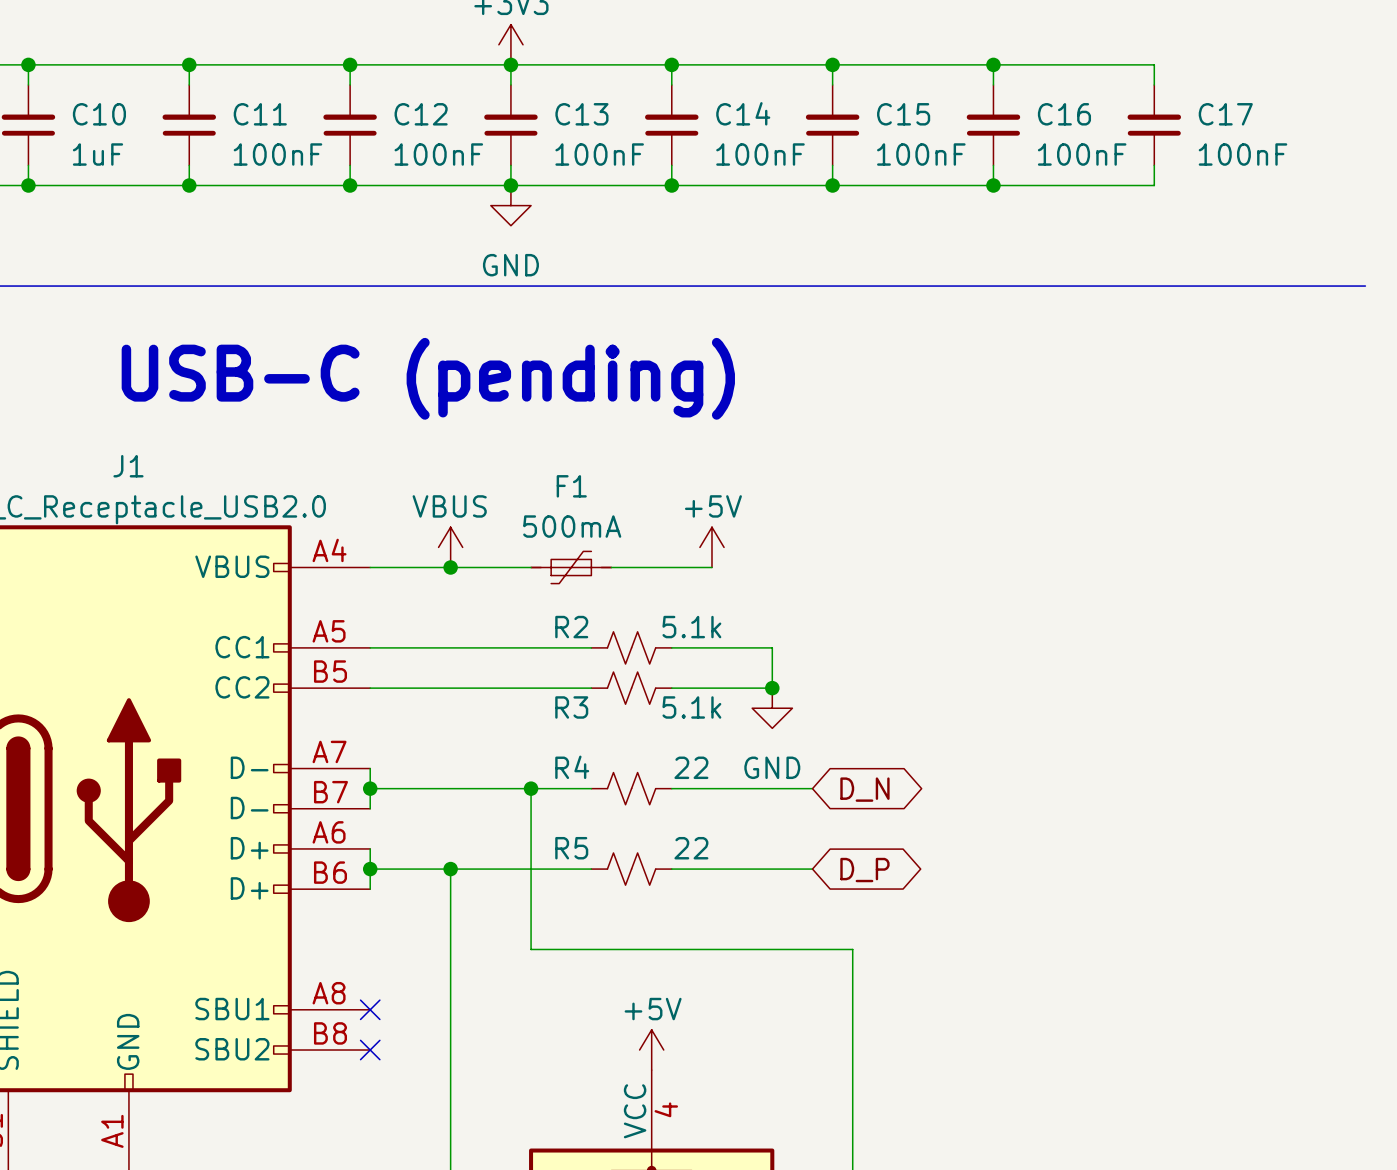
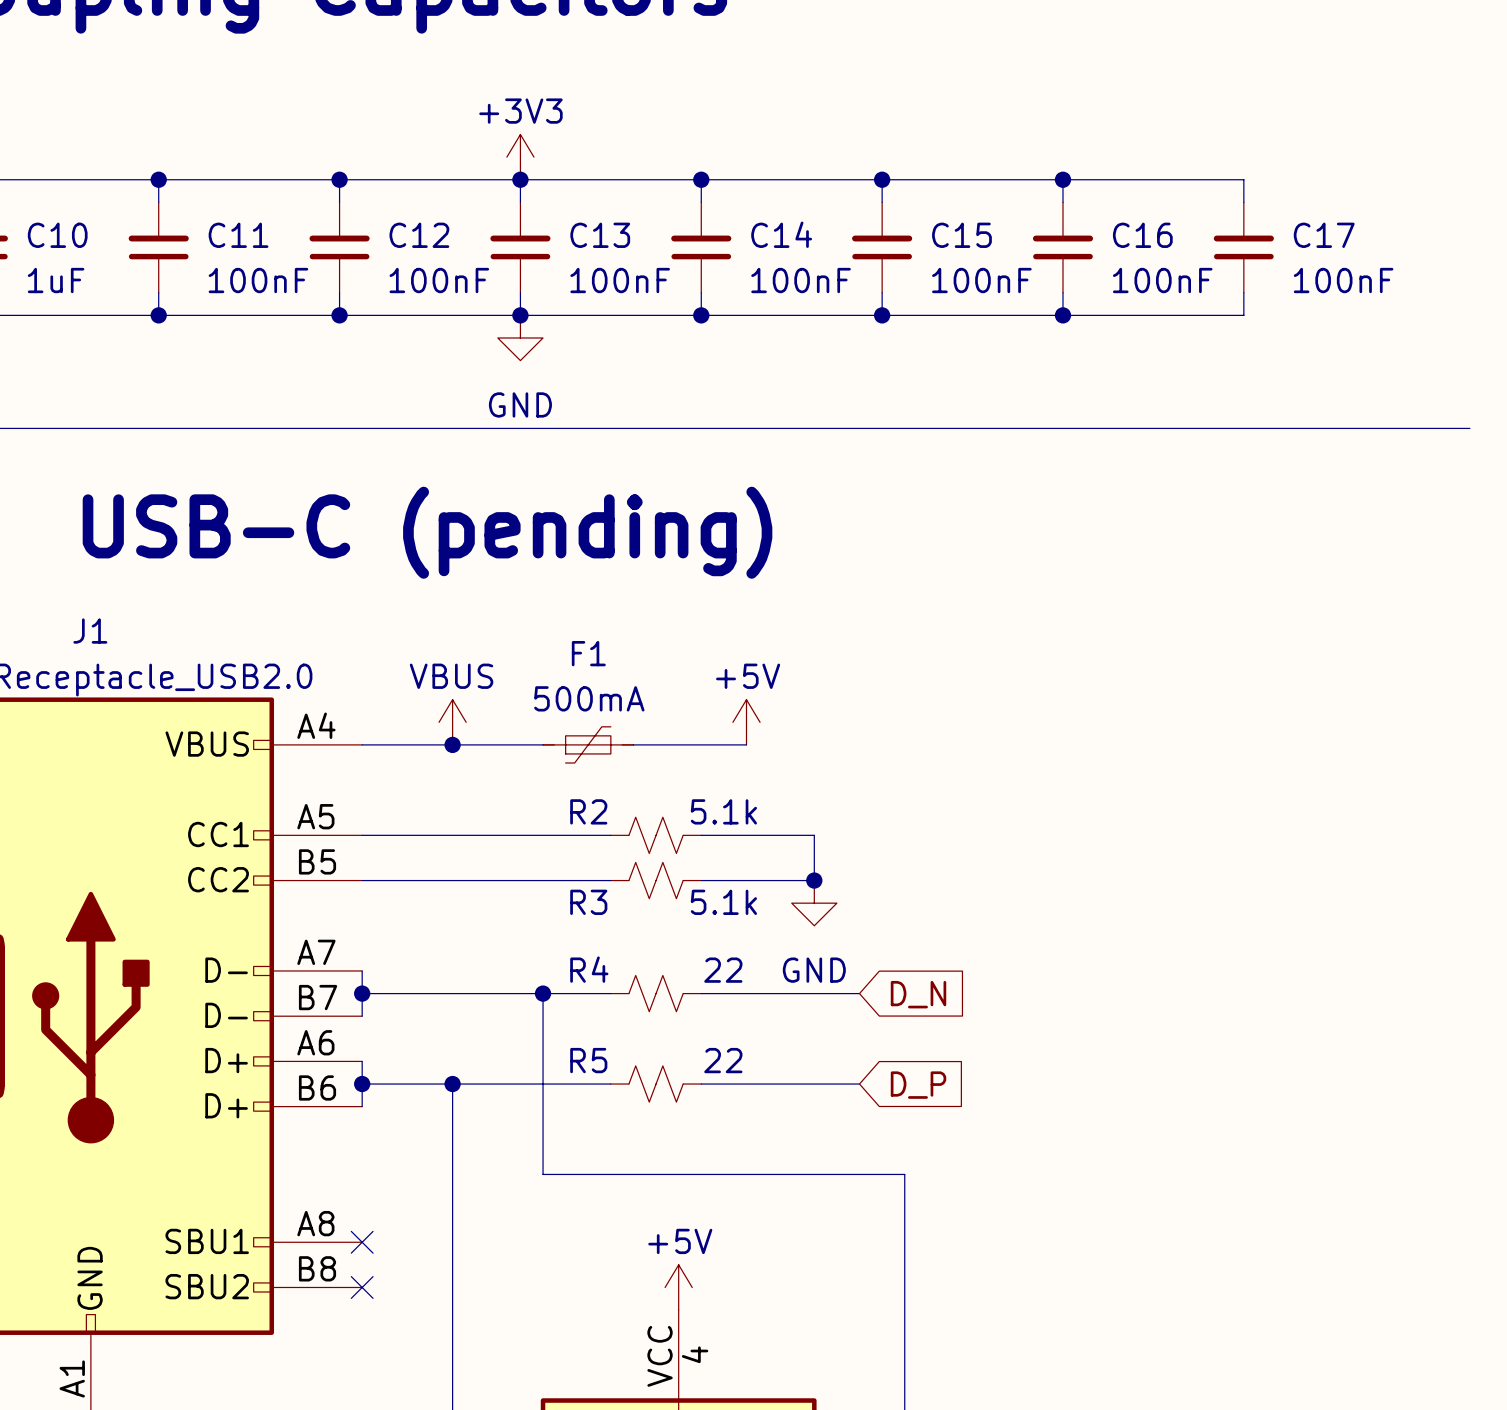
line: (1355, 286) (1365, 286) -> none
global label shape: bidirectional (864, 789) -> input (918, 994)
global label shape: bidirectional (864, 870) -> input (918, 1085)

